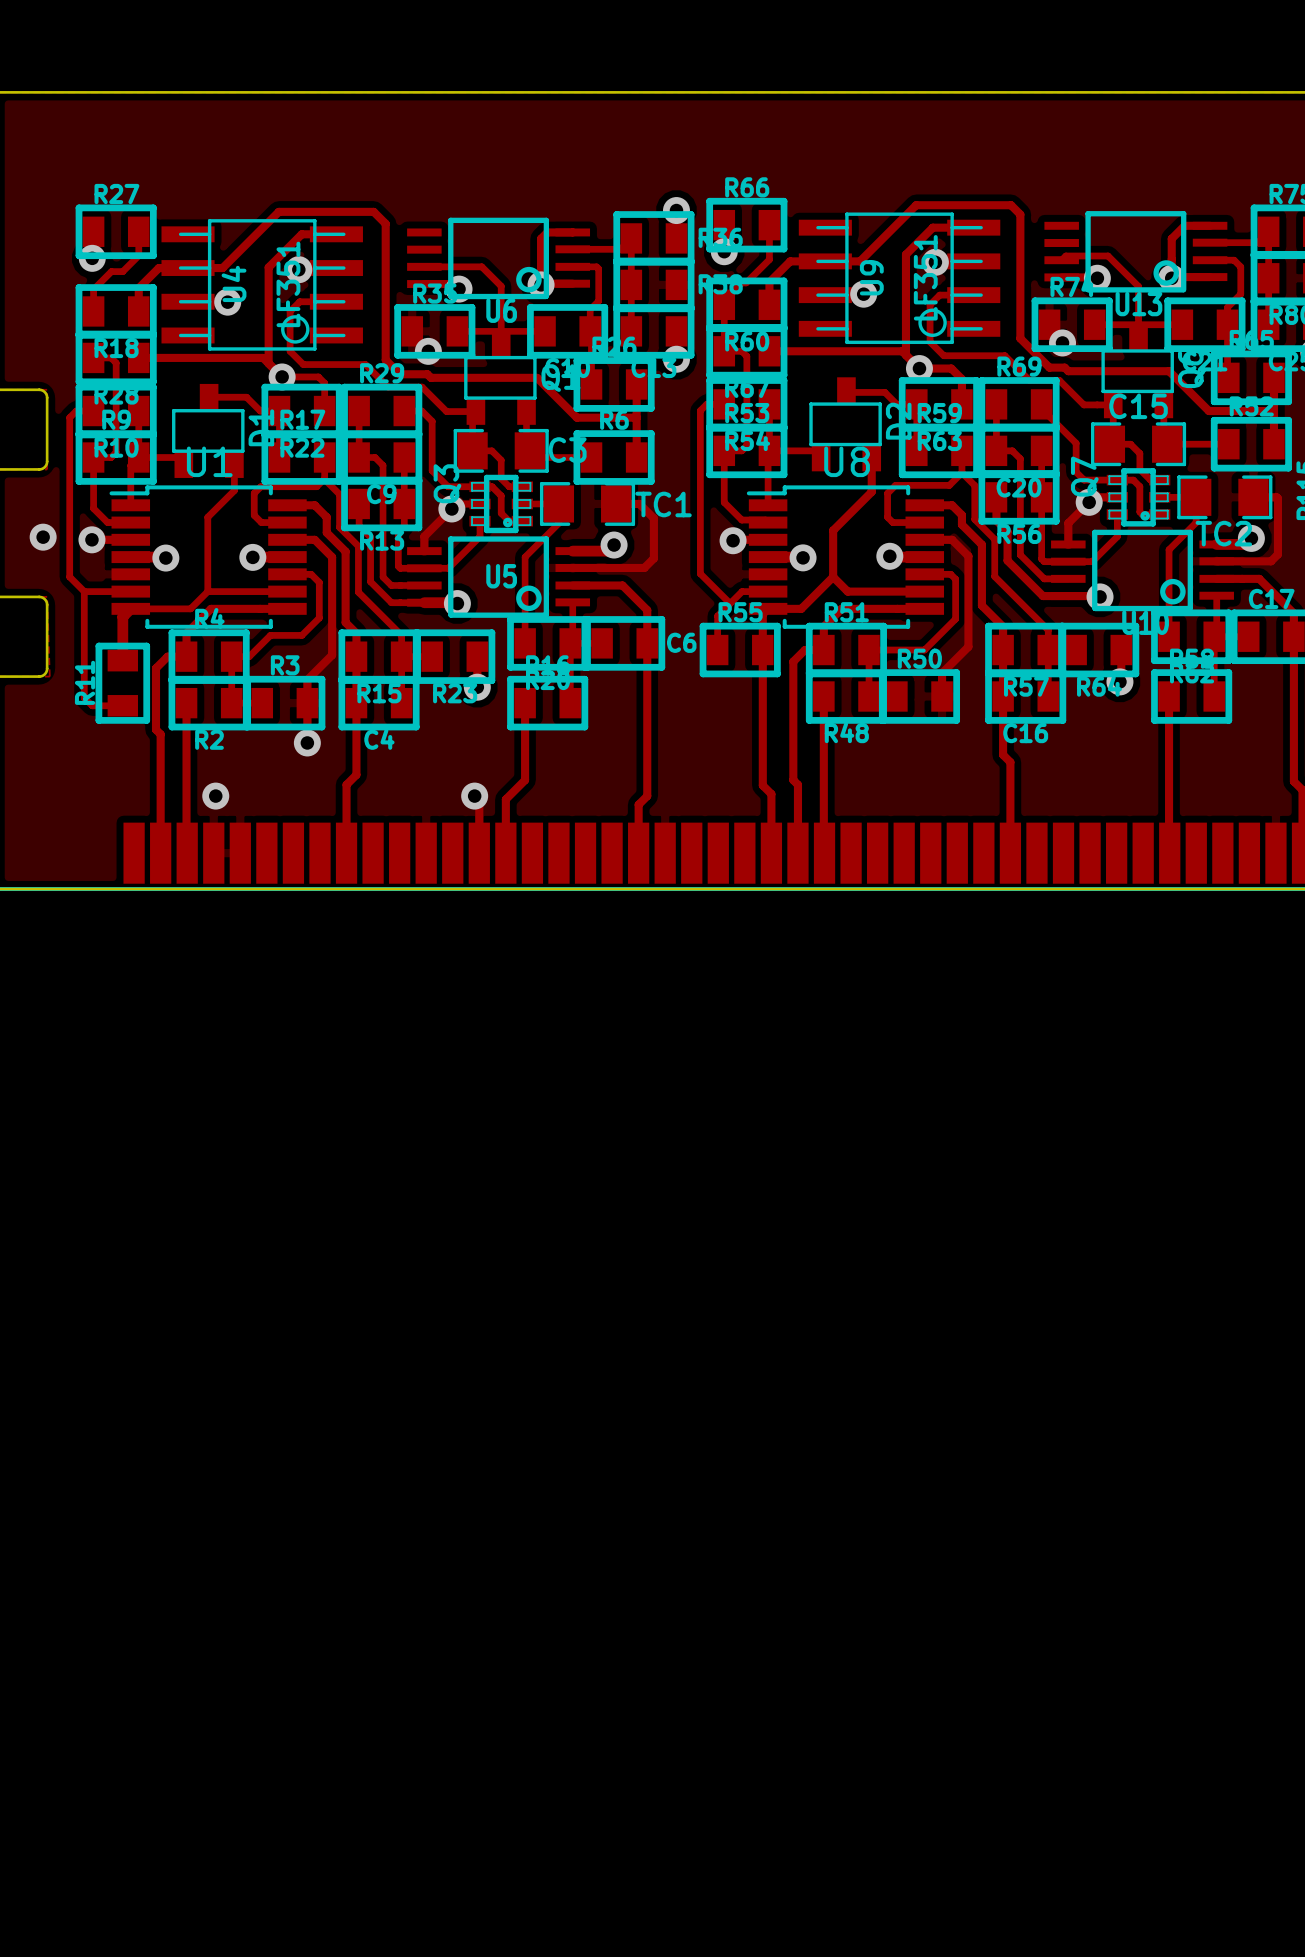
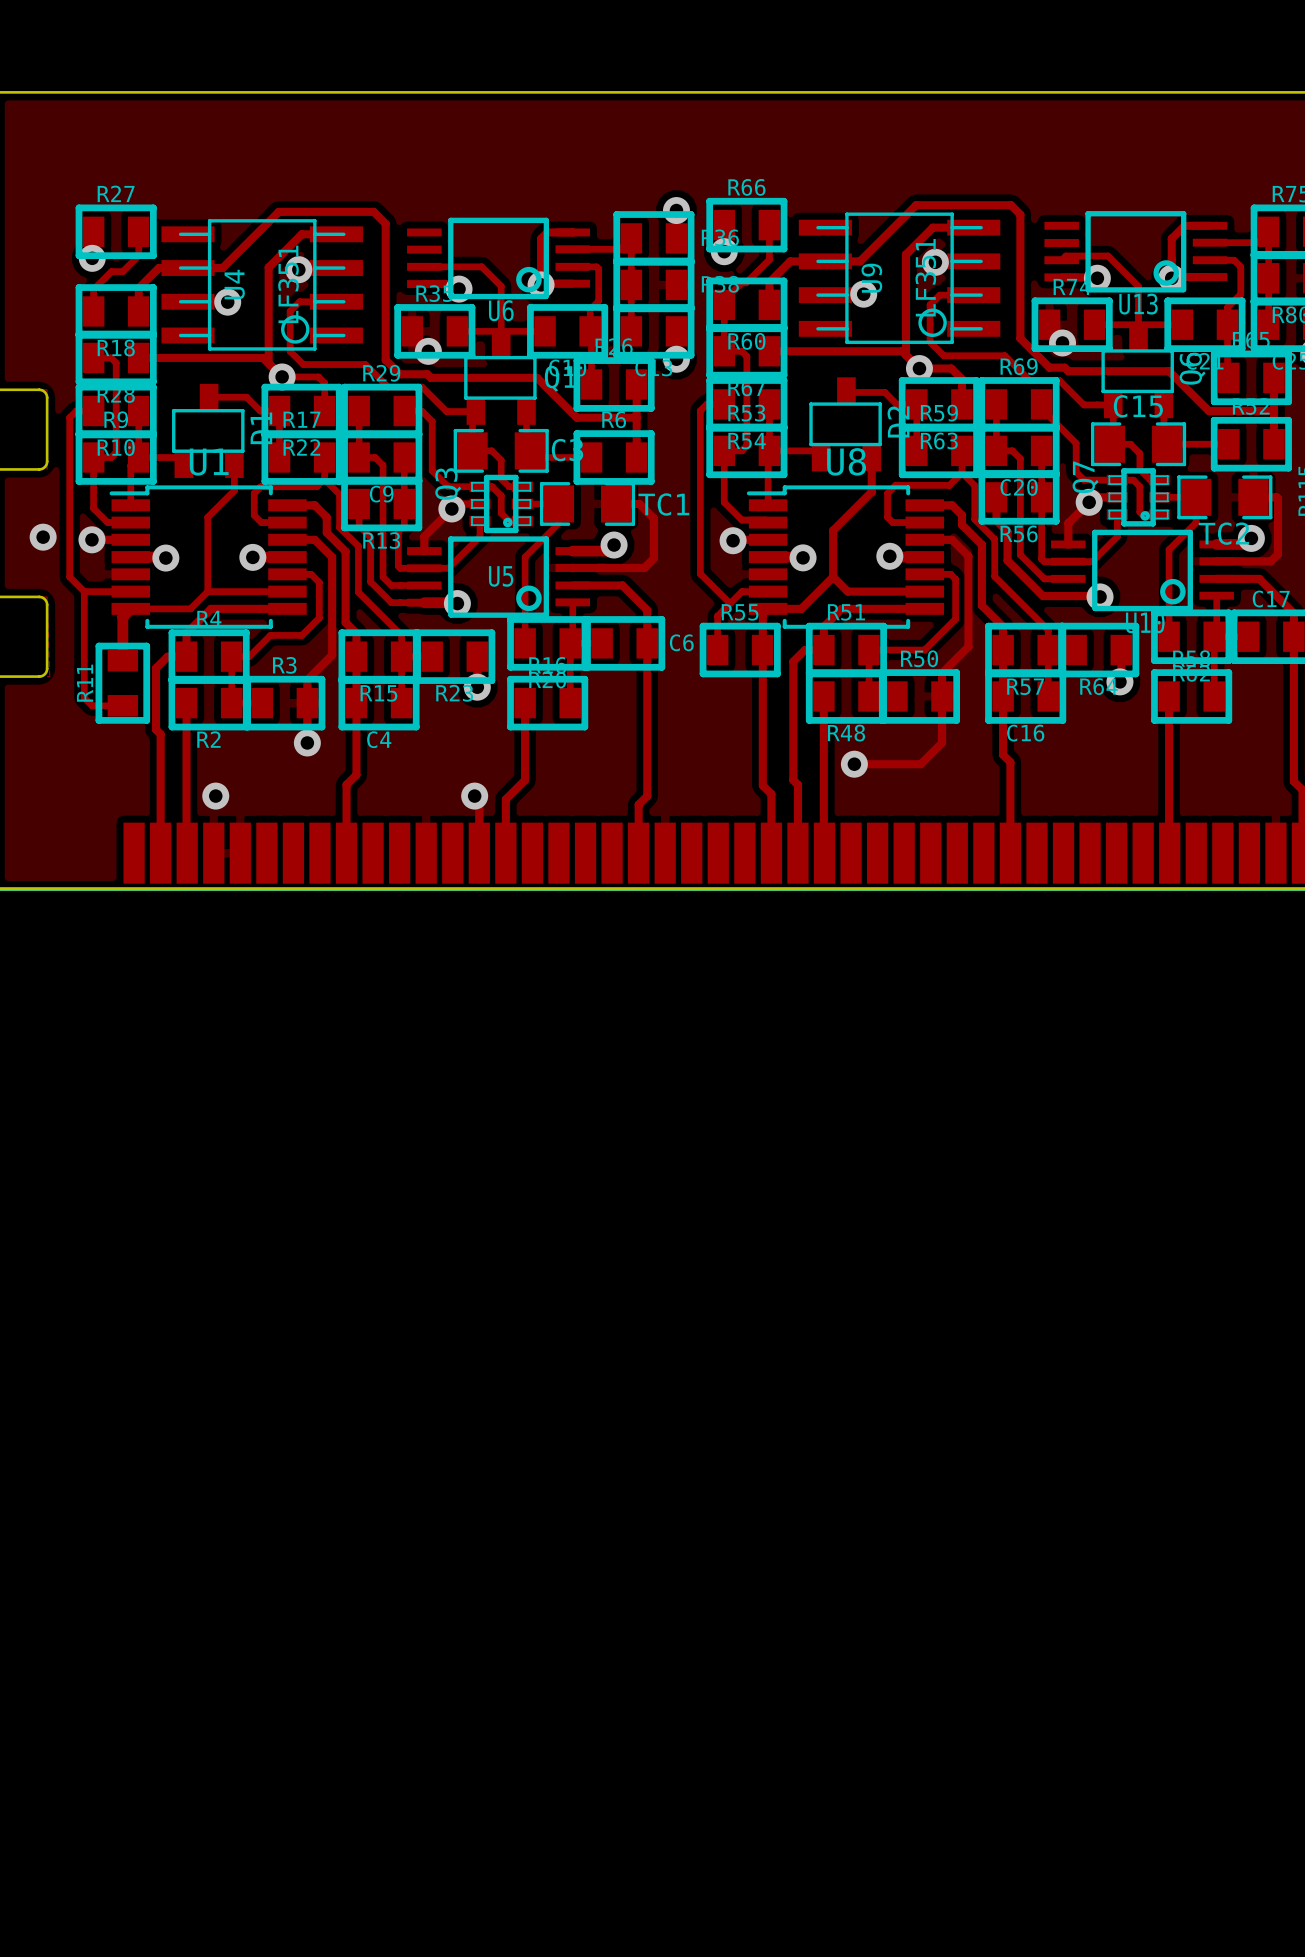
track: none -> (942, 696) (942, 742) (920, 764) (854, 764)
via: none -> (854, 764)

